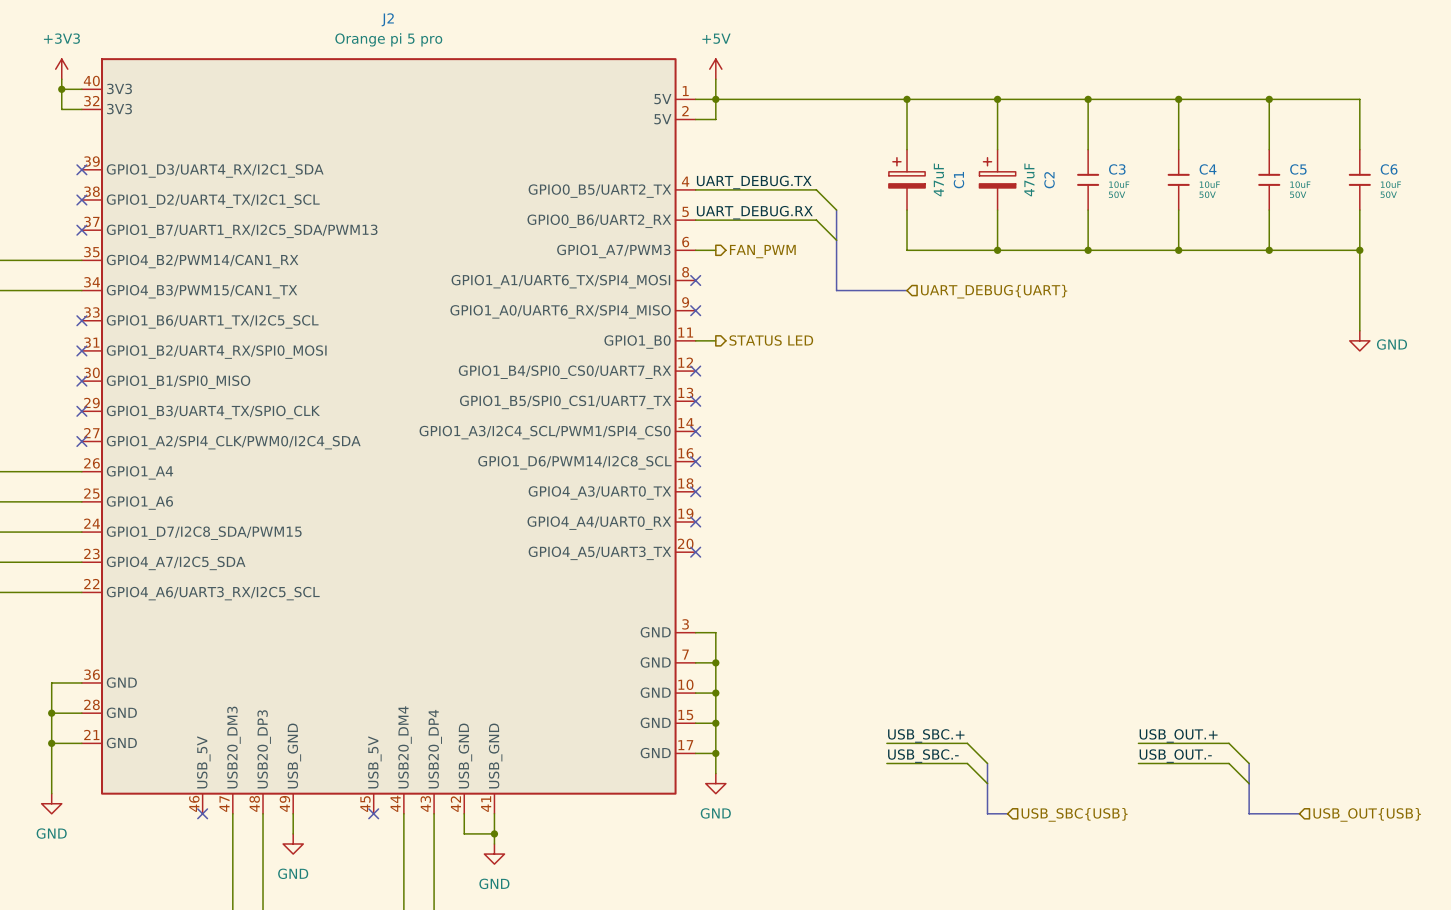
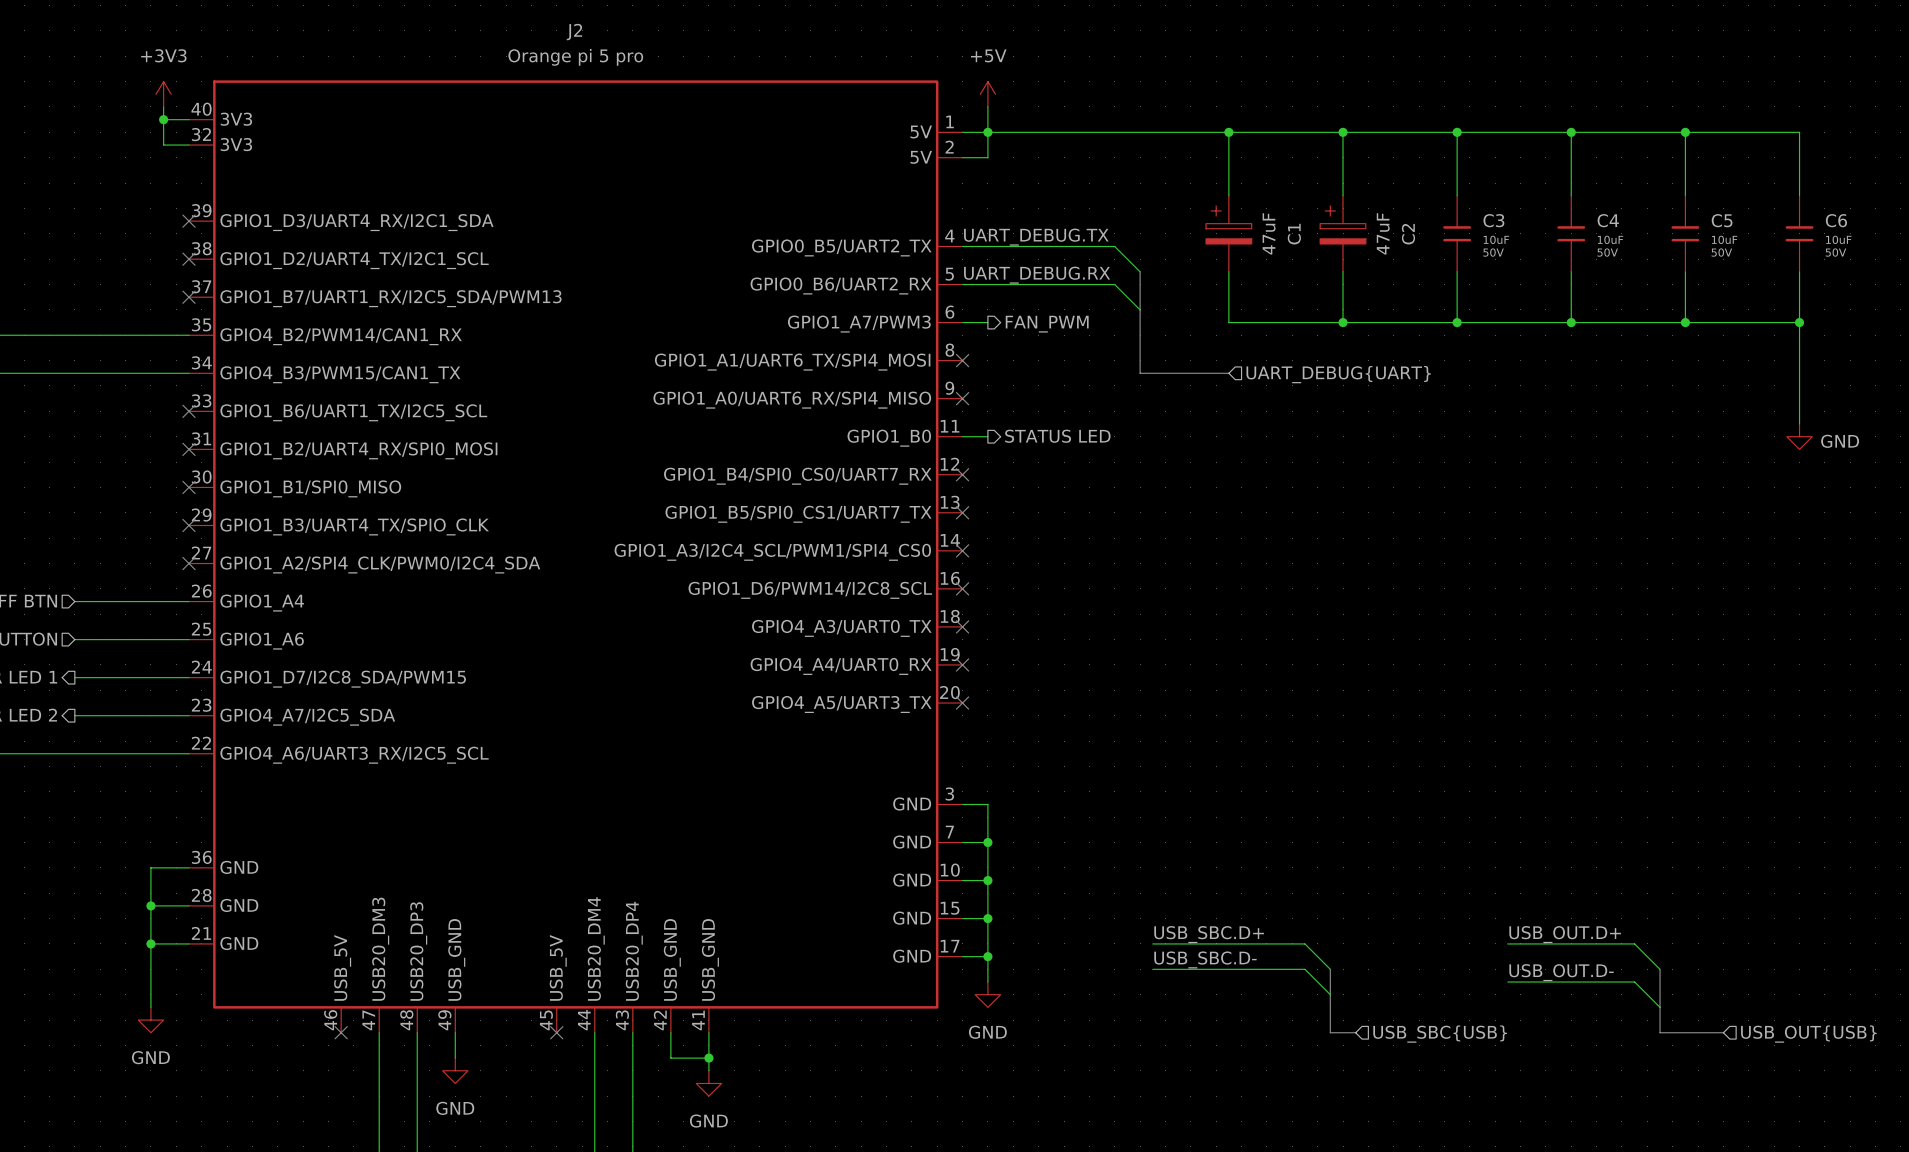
label: none -> USB_SBC.D+ (1209, 934)
label: USB_SBC.+ (926, 735) -> none
label: USB_OUT.+ (1178, 735) -> USB_OUT.D+ (1565, 934)
wire: none -> (1152, 943) (1203, 943)
wire: none -> (1507, 943) (1520, 943)
label: none -> USB_SBC.D- (1205, 959)
label: USB_SBC.- (923, 756) -> none
label: USB_OUT.- (1175, 756) -> none
wire: none -> (1152, 969) (1203, 969)
wire: (1138, 763) (1229, 763) (1249, 783) -> none
label: none -> USB_OUT.D- (1561, 972)
wire: none -> (1507, 982) (1634, 982) (1660, 1007)

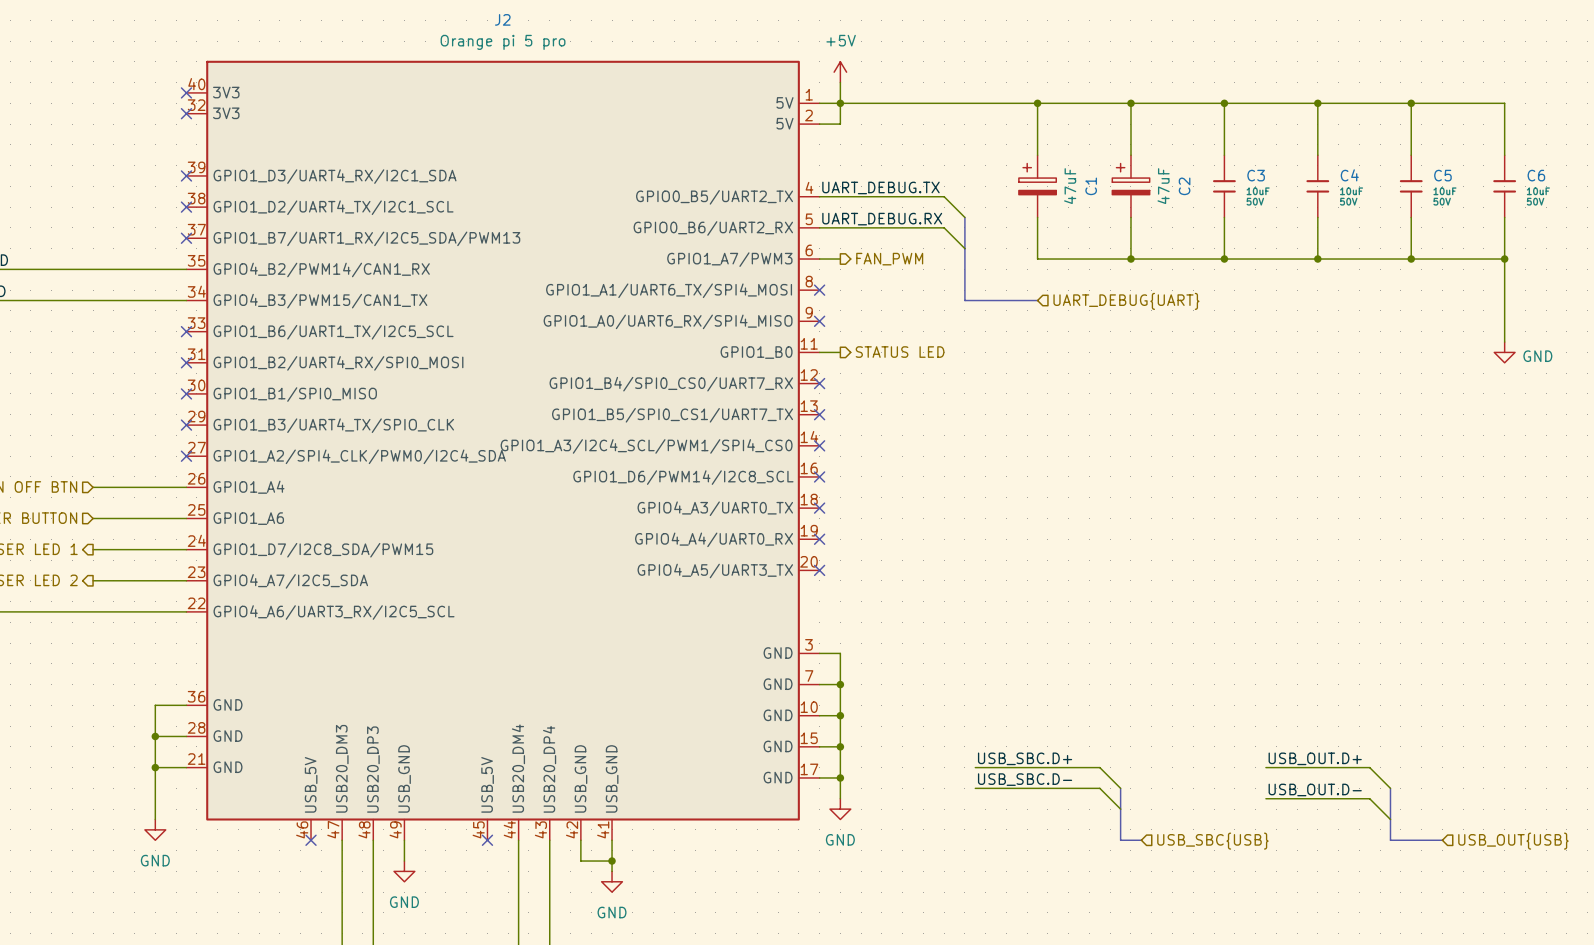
power symbol: +3V3 (163, 94) -> none
wire: (163, 106) (163, 145) (188, 145) -> none
wire: (163, 119) (188, 119) -> none
junction: (163, 119) -> none
no-connect mark: none -> (186, 92)
no-connect mark: none -> (186, 113)

